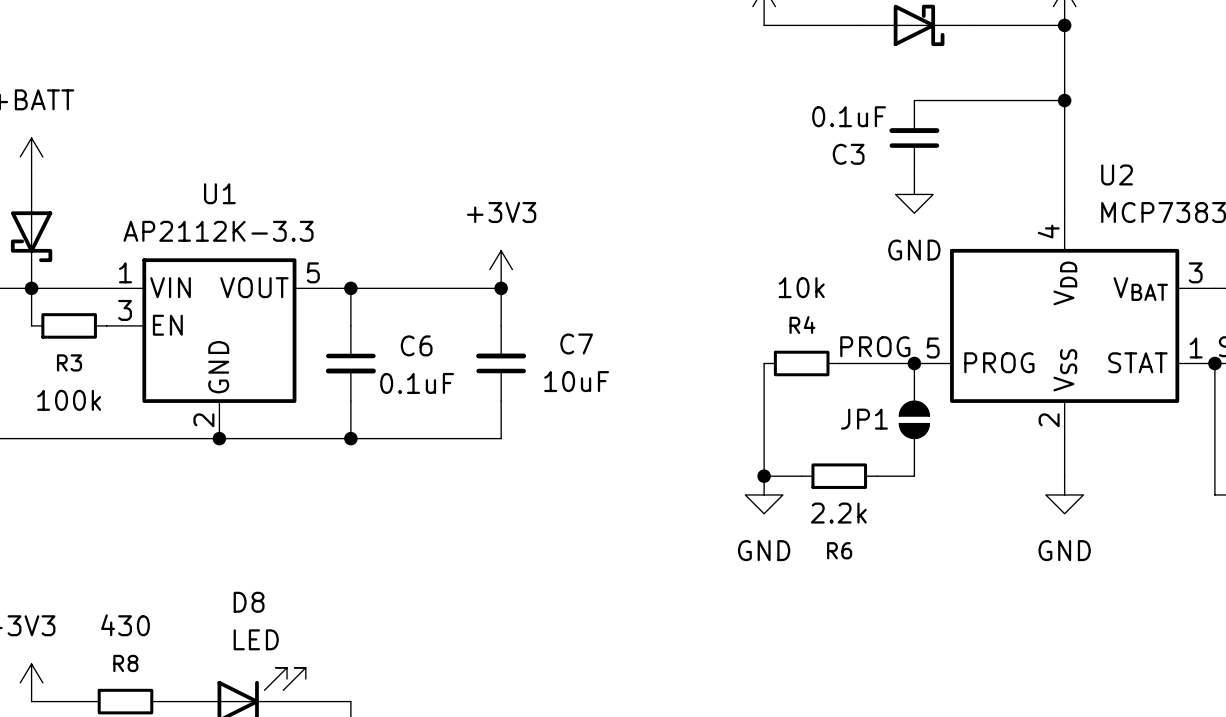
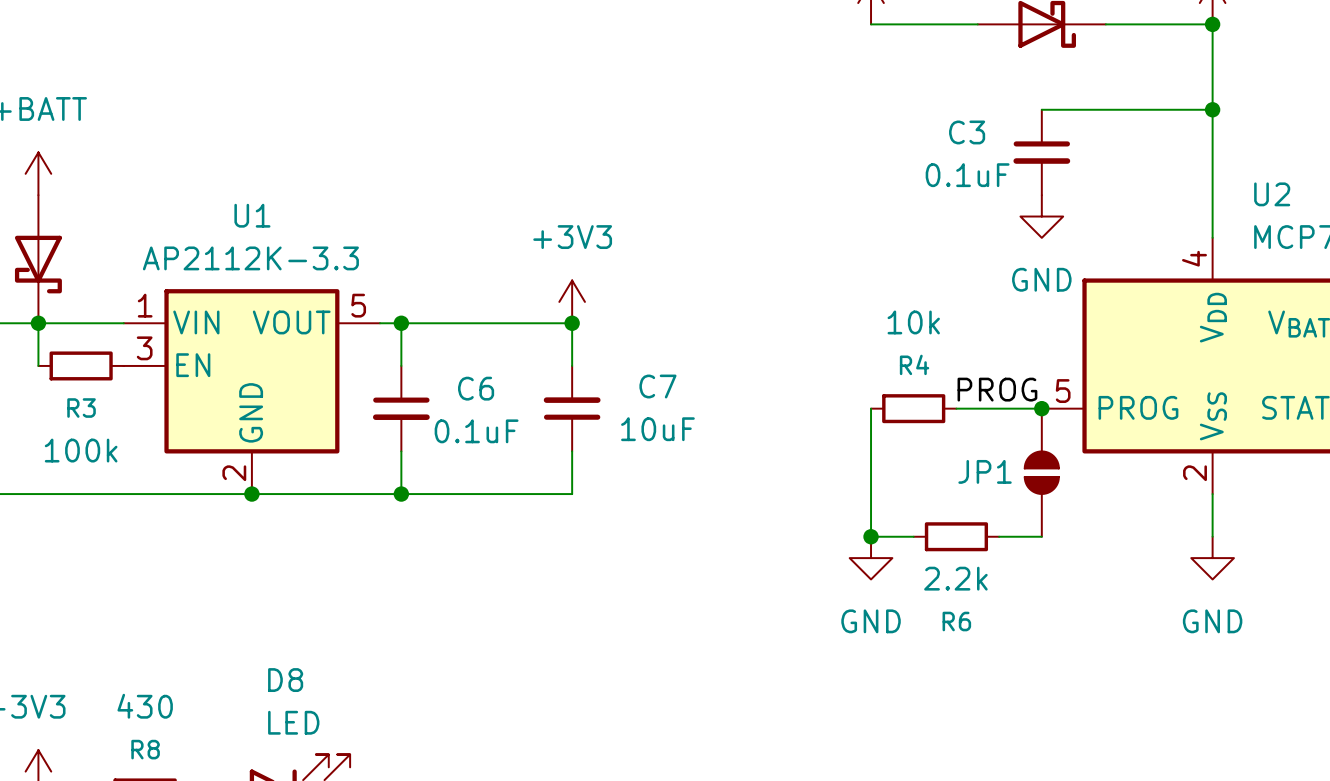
C3 value position: 0.1uF (849, 116) -> 0.1uF (967, 175)
C3 rotation: 0° (914, 138) -> 180° (1041, 152)
C3 name position: C3 (848, 154) -> C3 (967, 132)

